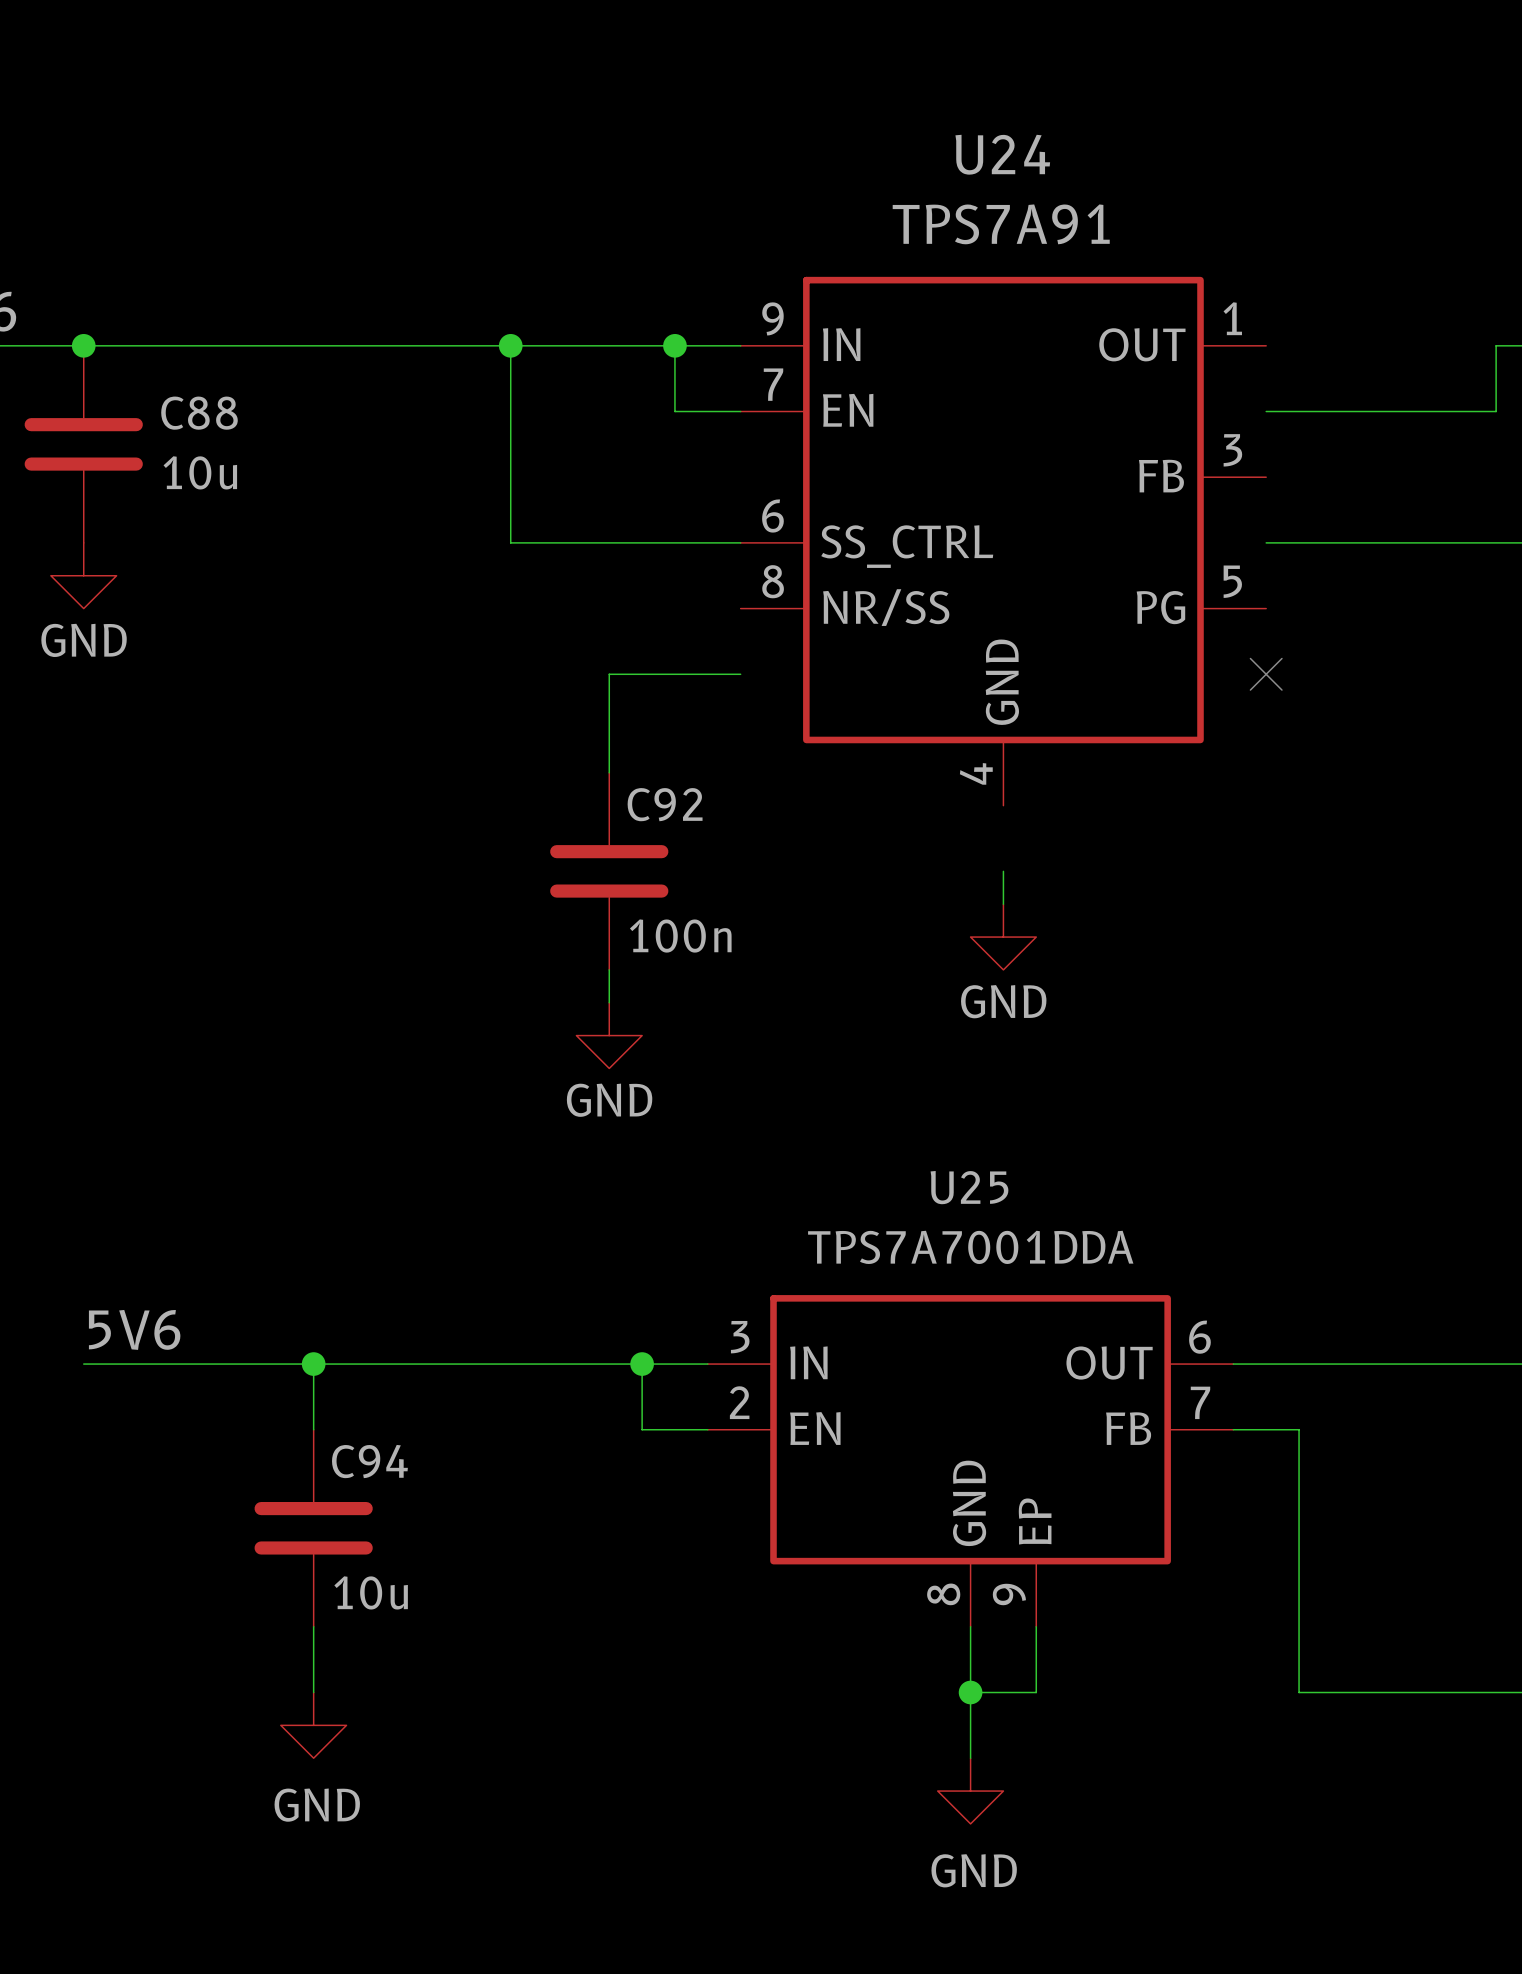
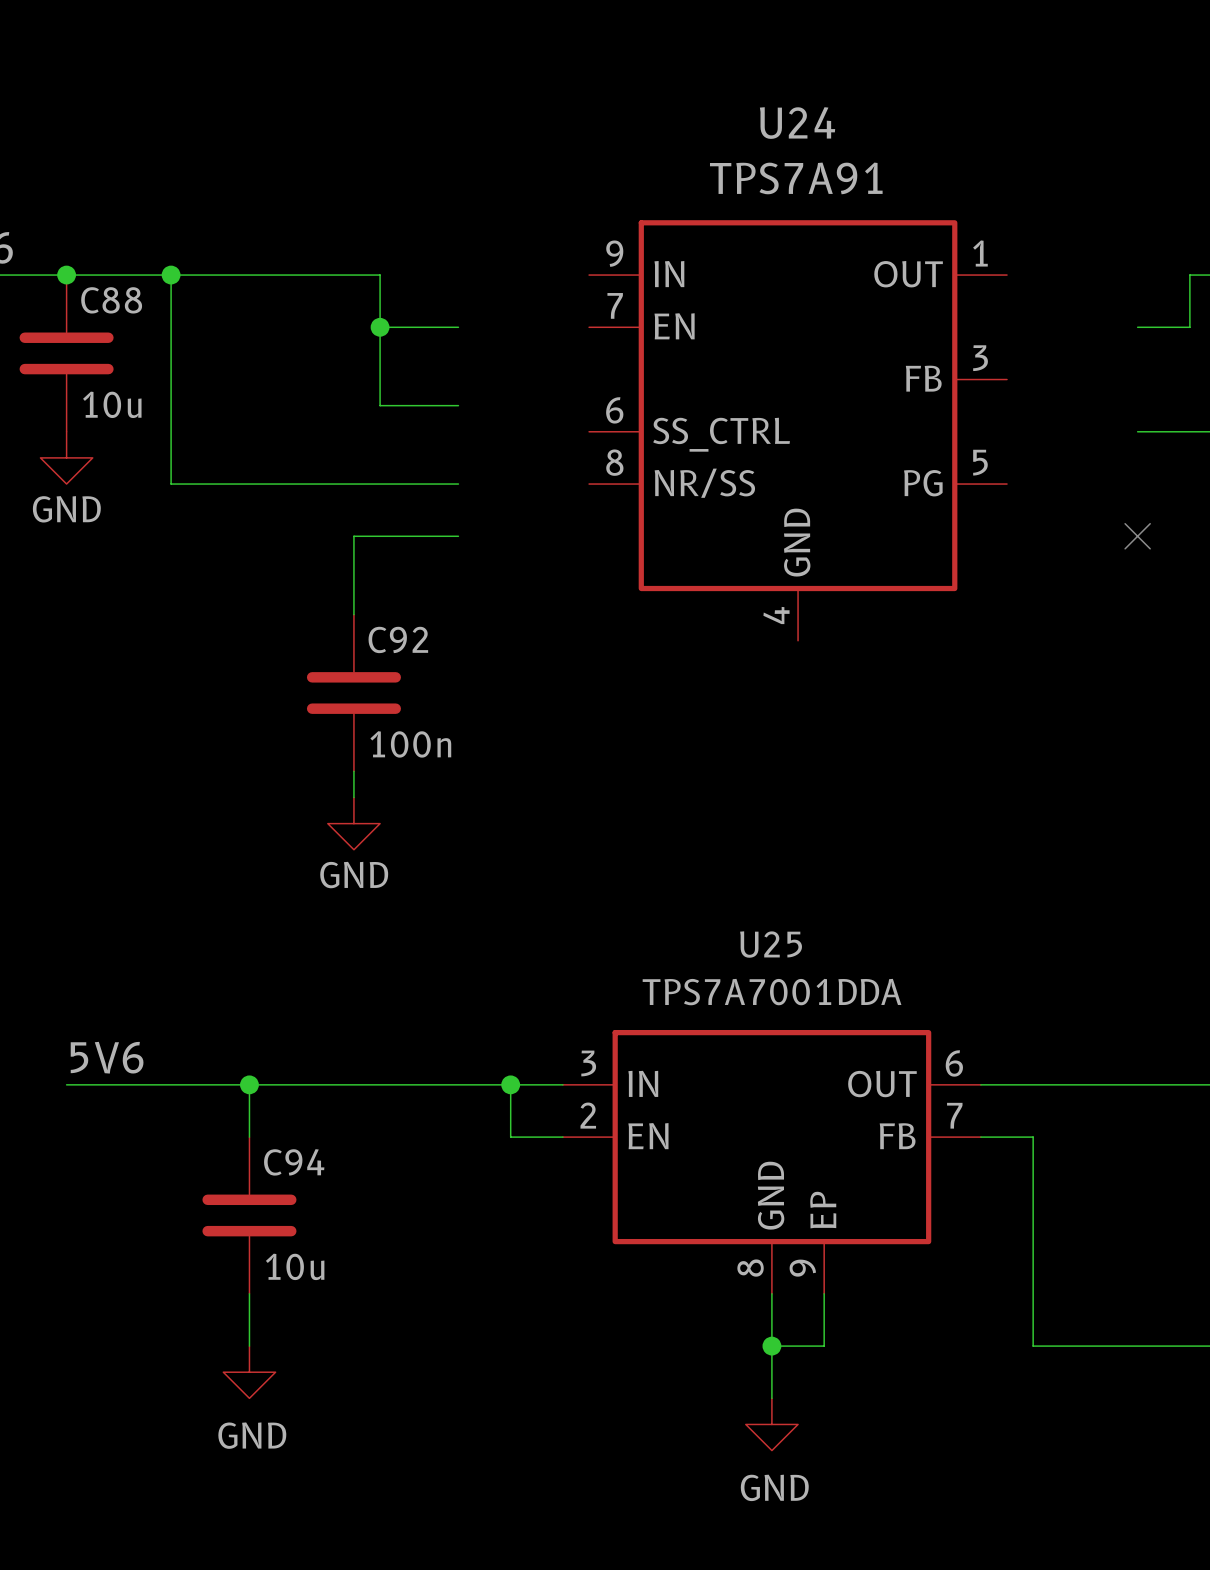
wire: none -> (171, 275) (171, 484) (458, 484)
junction: none -> (171, 275)
wire: (477, 345) (740, 345) -> (380, 275) (380, 405) (458, 405)
wire: (510, 345) (510, 542) (740, 542) -> none
junction position: (510, 345) -> (380, 327)
wire: (674, 345) (674, 411) (740, 411) -> none
junction: (674, 345) -> none
wire: none -> (380, 327) (458, 327)
wire: (1266, 411) (1430, 411) -> none
C88 name position: C88 (199, 413) -> C88 (111, 300)
C88 value position: 10u (200, 472) -> 10u (112, 404)
wire: (1266, 542) (1430, 542) -> none
wire: (740, 674) (609, 674) (609, 772) -> (458, 536) (353, 536) (353, 614)
no-connect mark: (1266, 674) -> none
no-connect mark: none -> (1137, 536)
C92 position: (609, 871) -> (353, 693)
wire: (1003, 871) (1003, 904) -> none
power symbol: GND (1003, 937) -> none
wire: (609, 969) (609, 1002) -> (353, 771) (353, 797)
power symbol position: GND (609, 1035) -> GND (353, 823)

